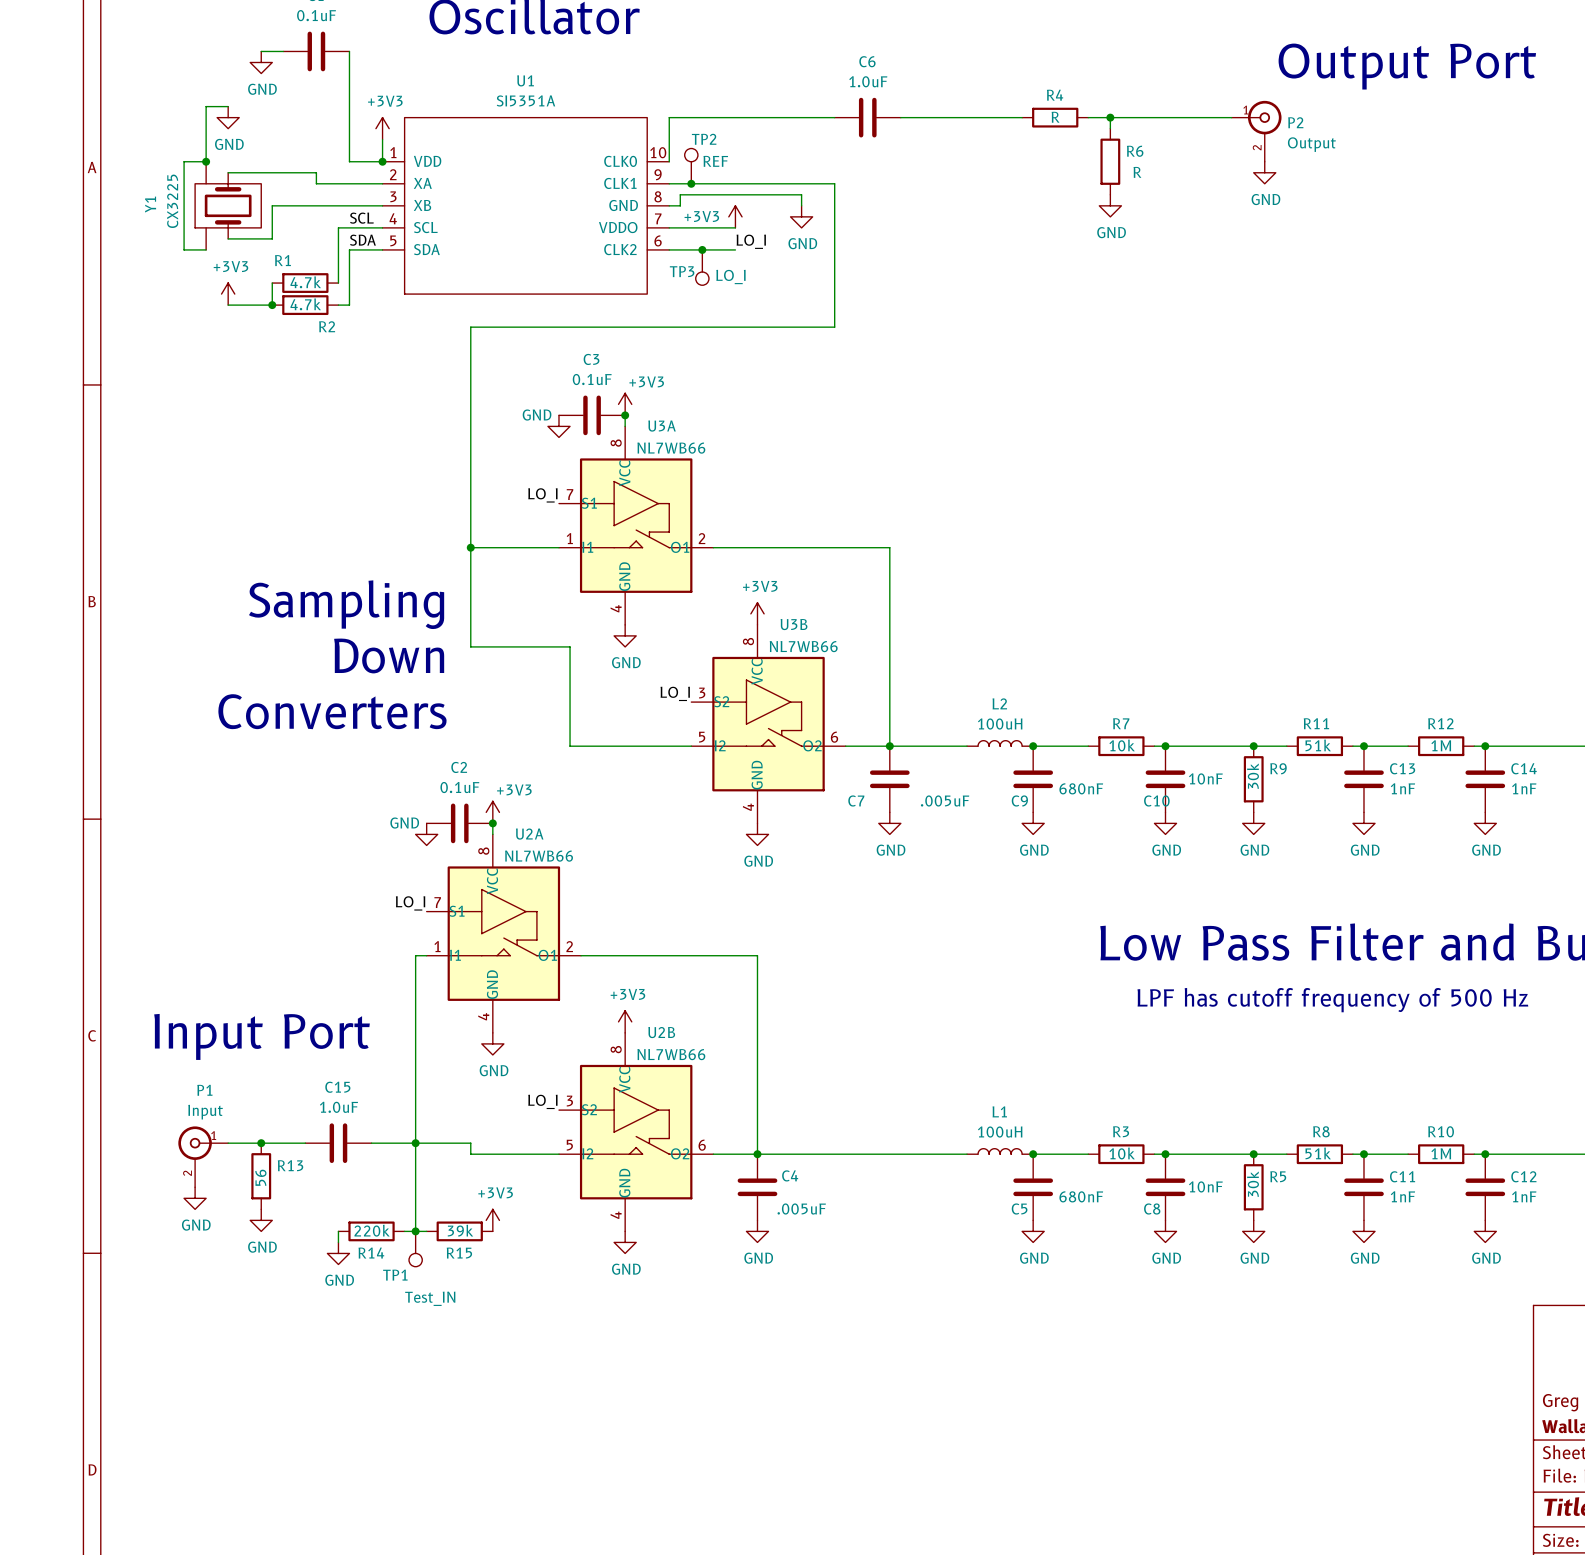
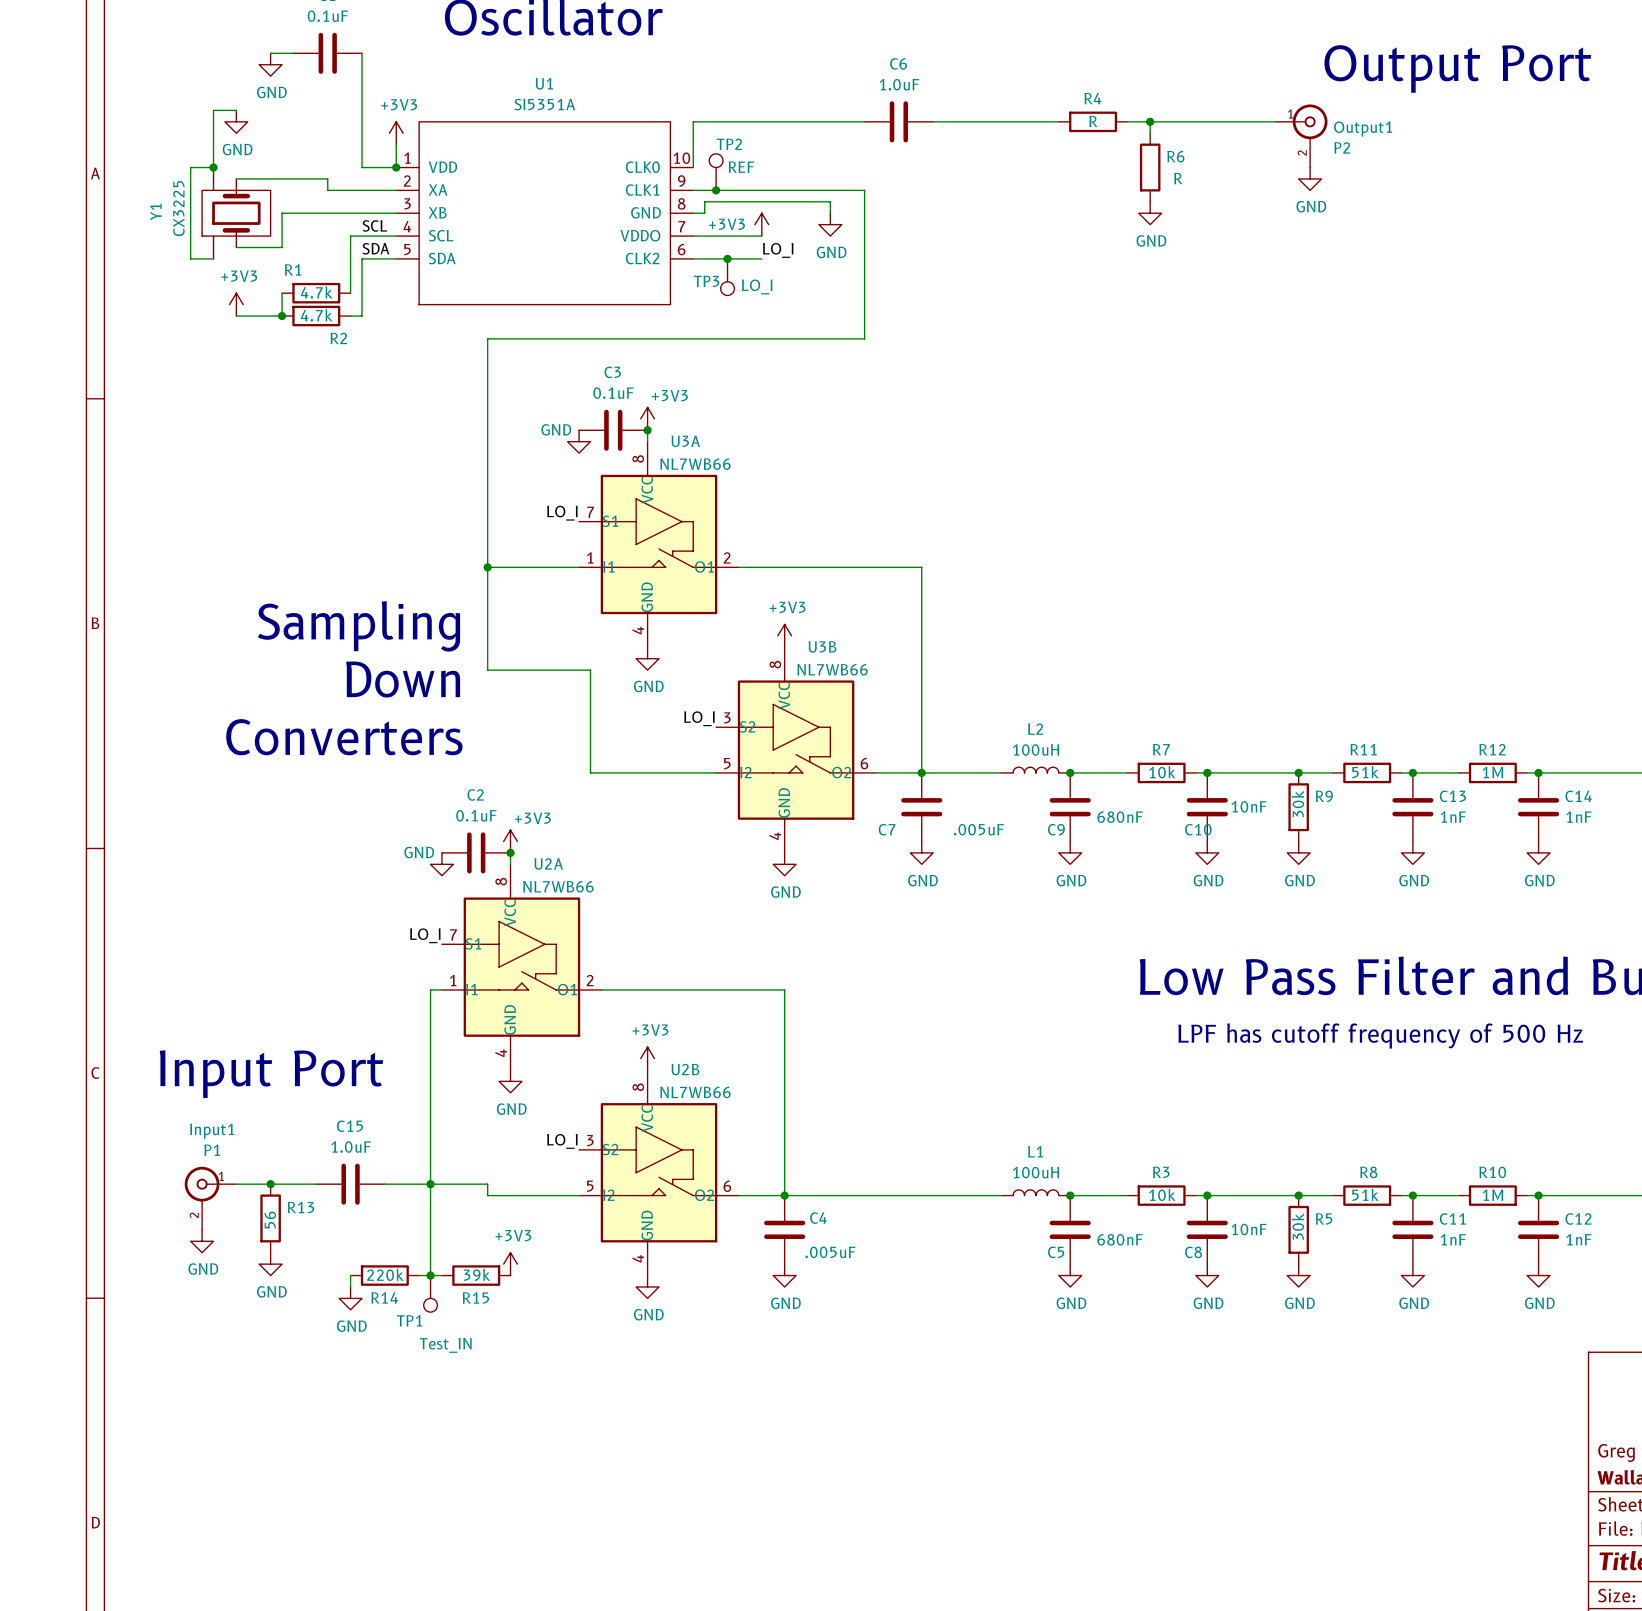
P2 name: P2 (1295, 122) -> Output1 (1363, 129)
P2 value: Output (1311, 144) -> P2 (1342, 147)
P1 name: P1 (204, 1090) -> Input1 (212, 1131)
P1 value: Input (205, 1112) -> P1 (212, 1150)

